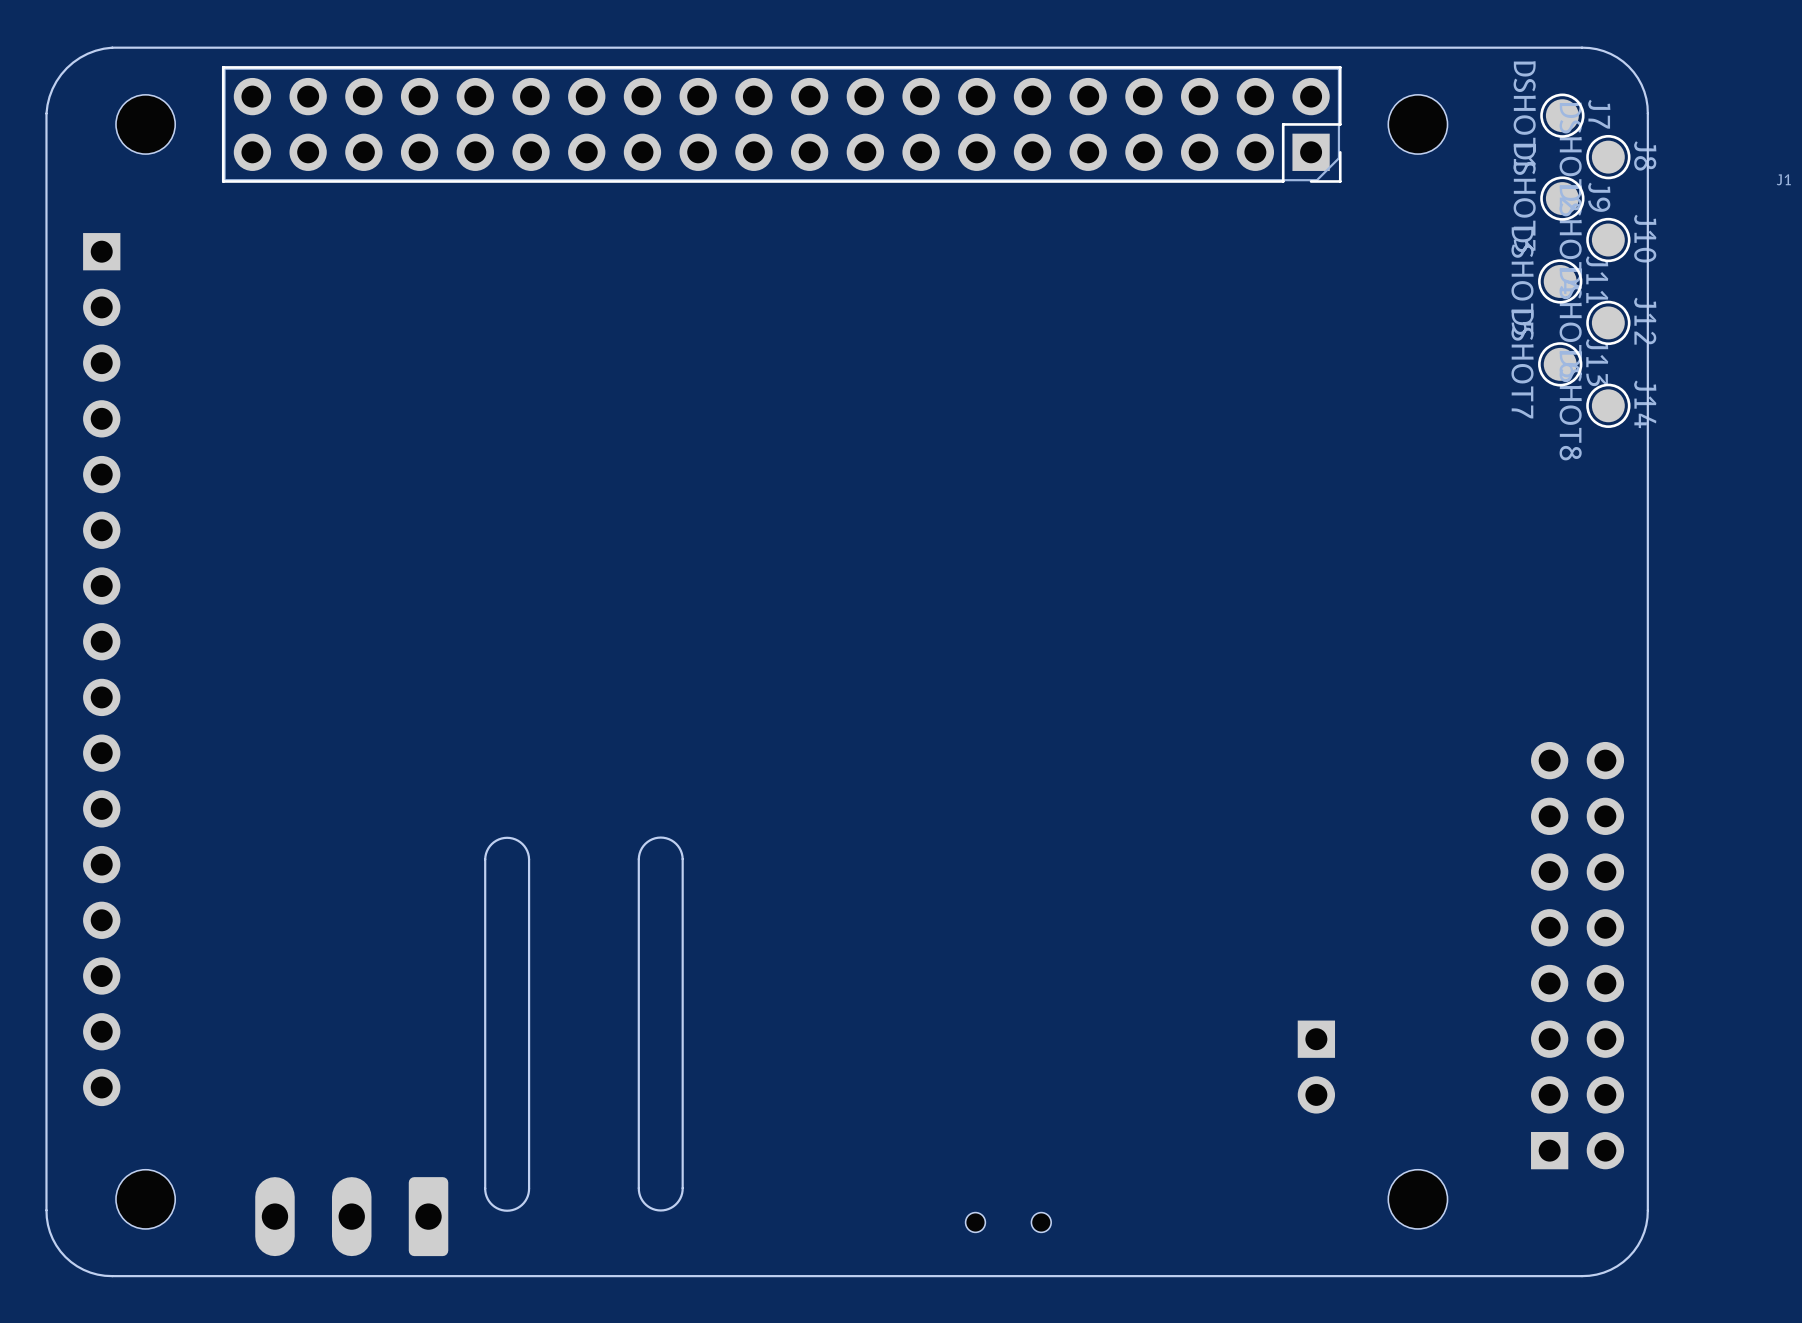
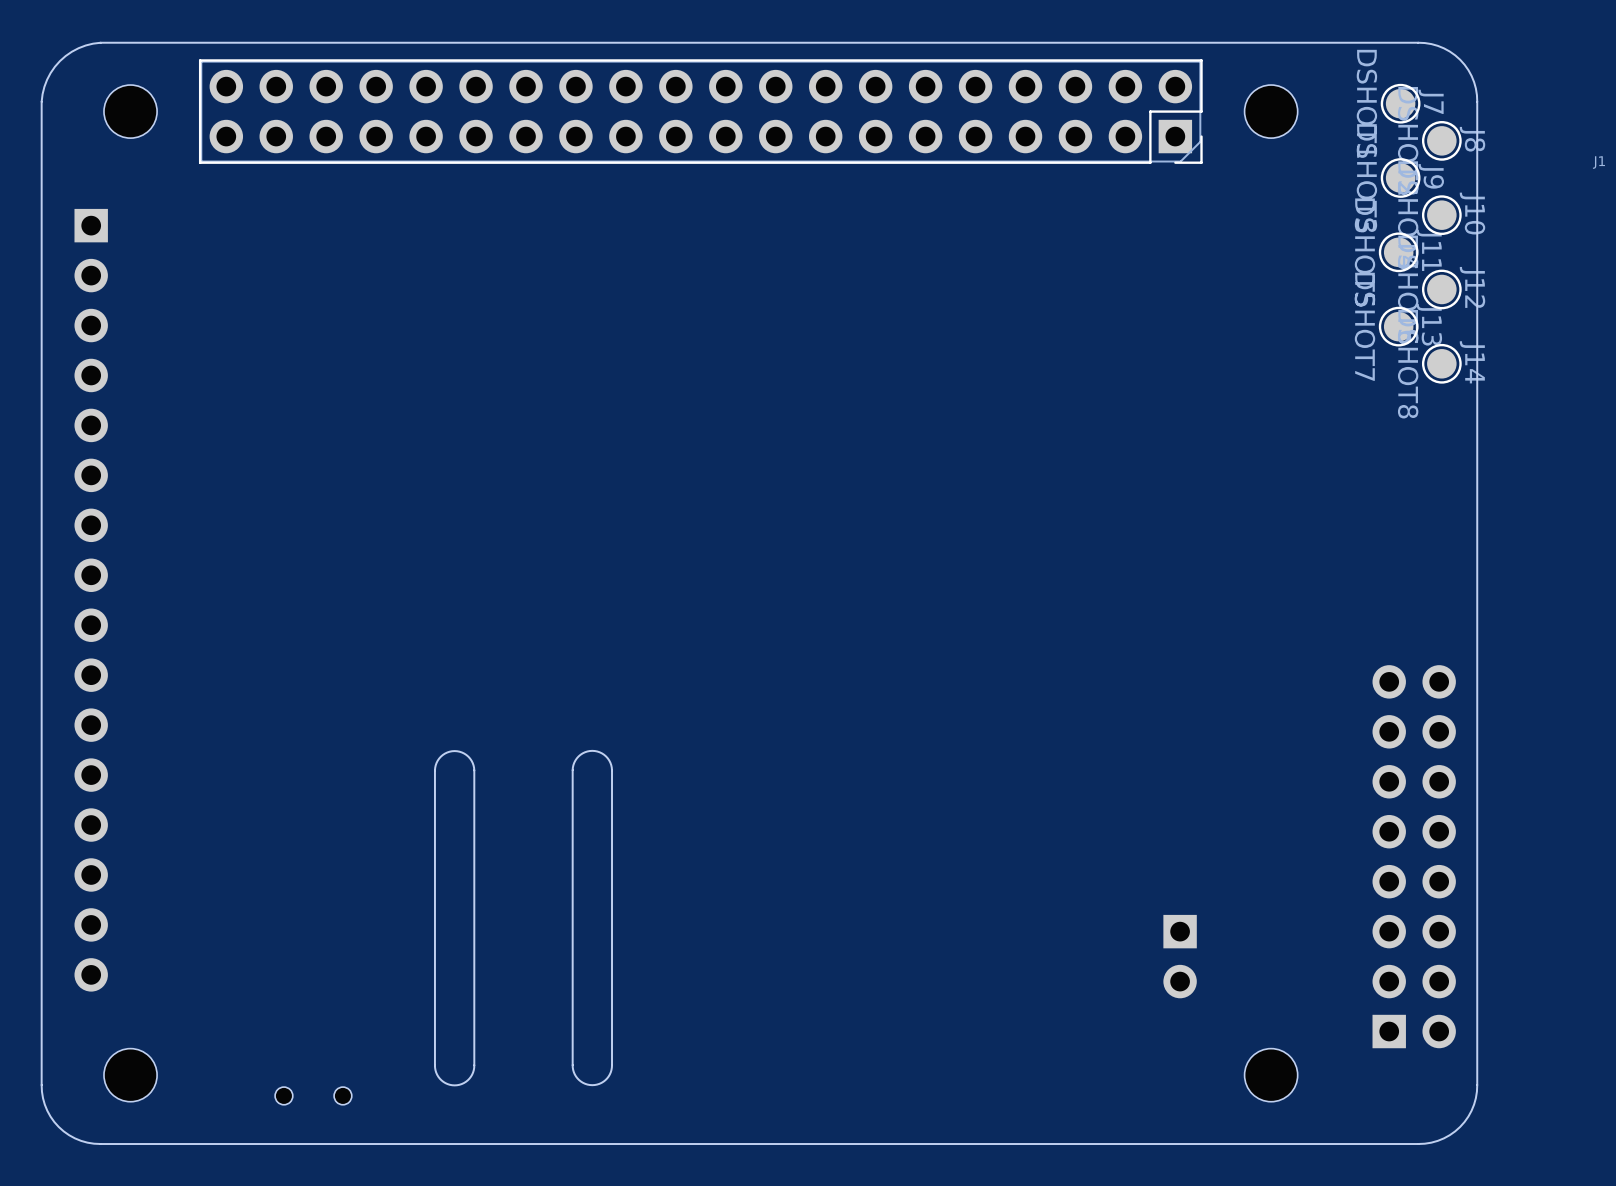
part footprint: [255, 1177, 449, 1257] -> [275, 1087, 352, 1105]
part: (1008, 1222) -> none

